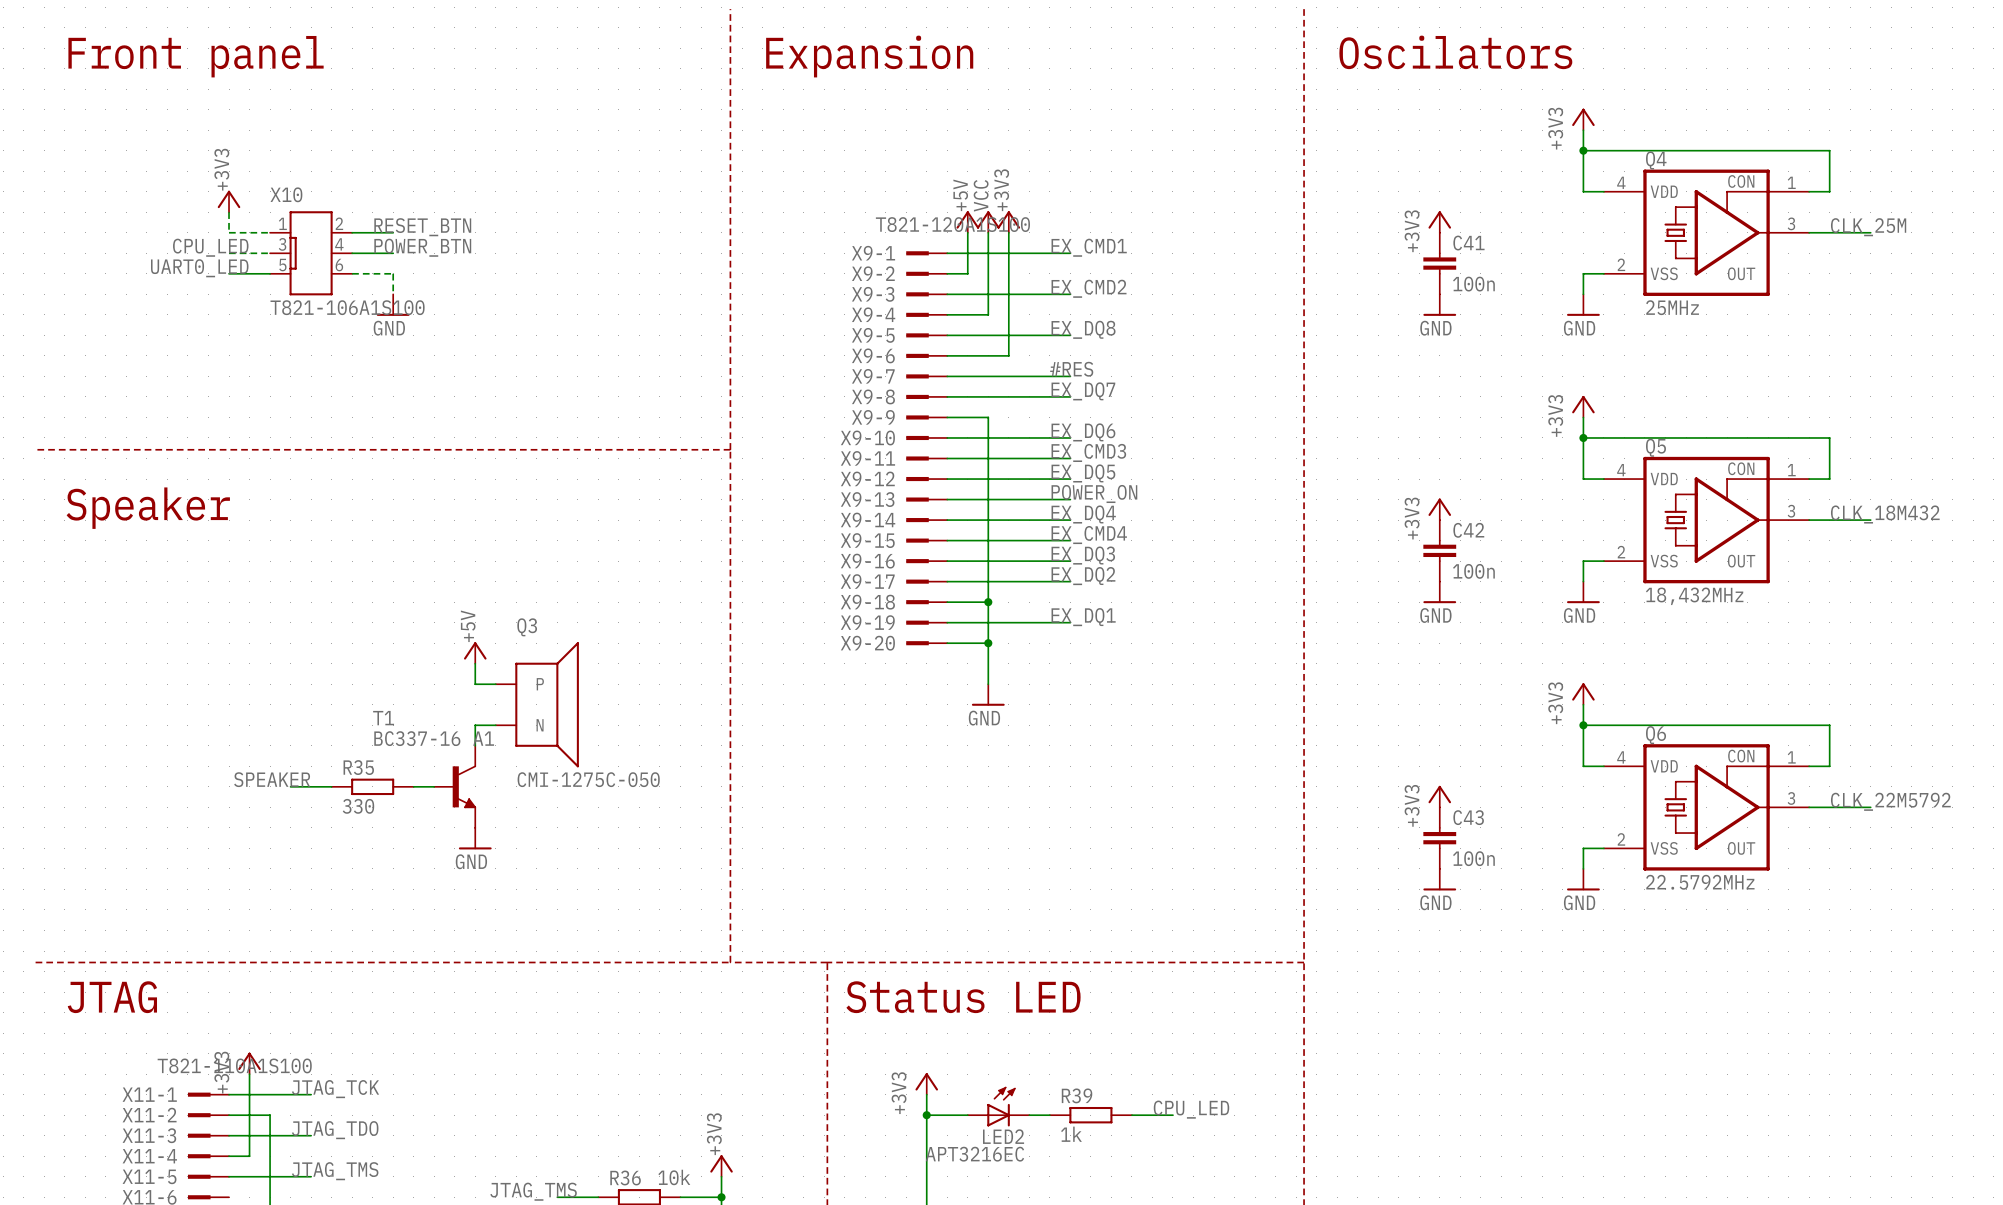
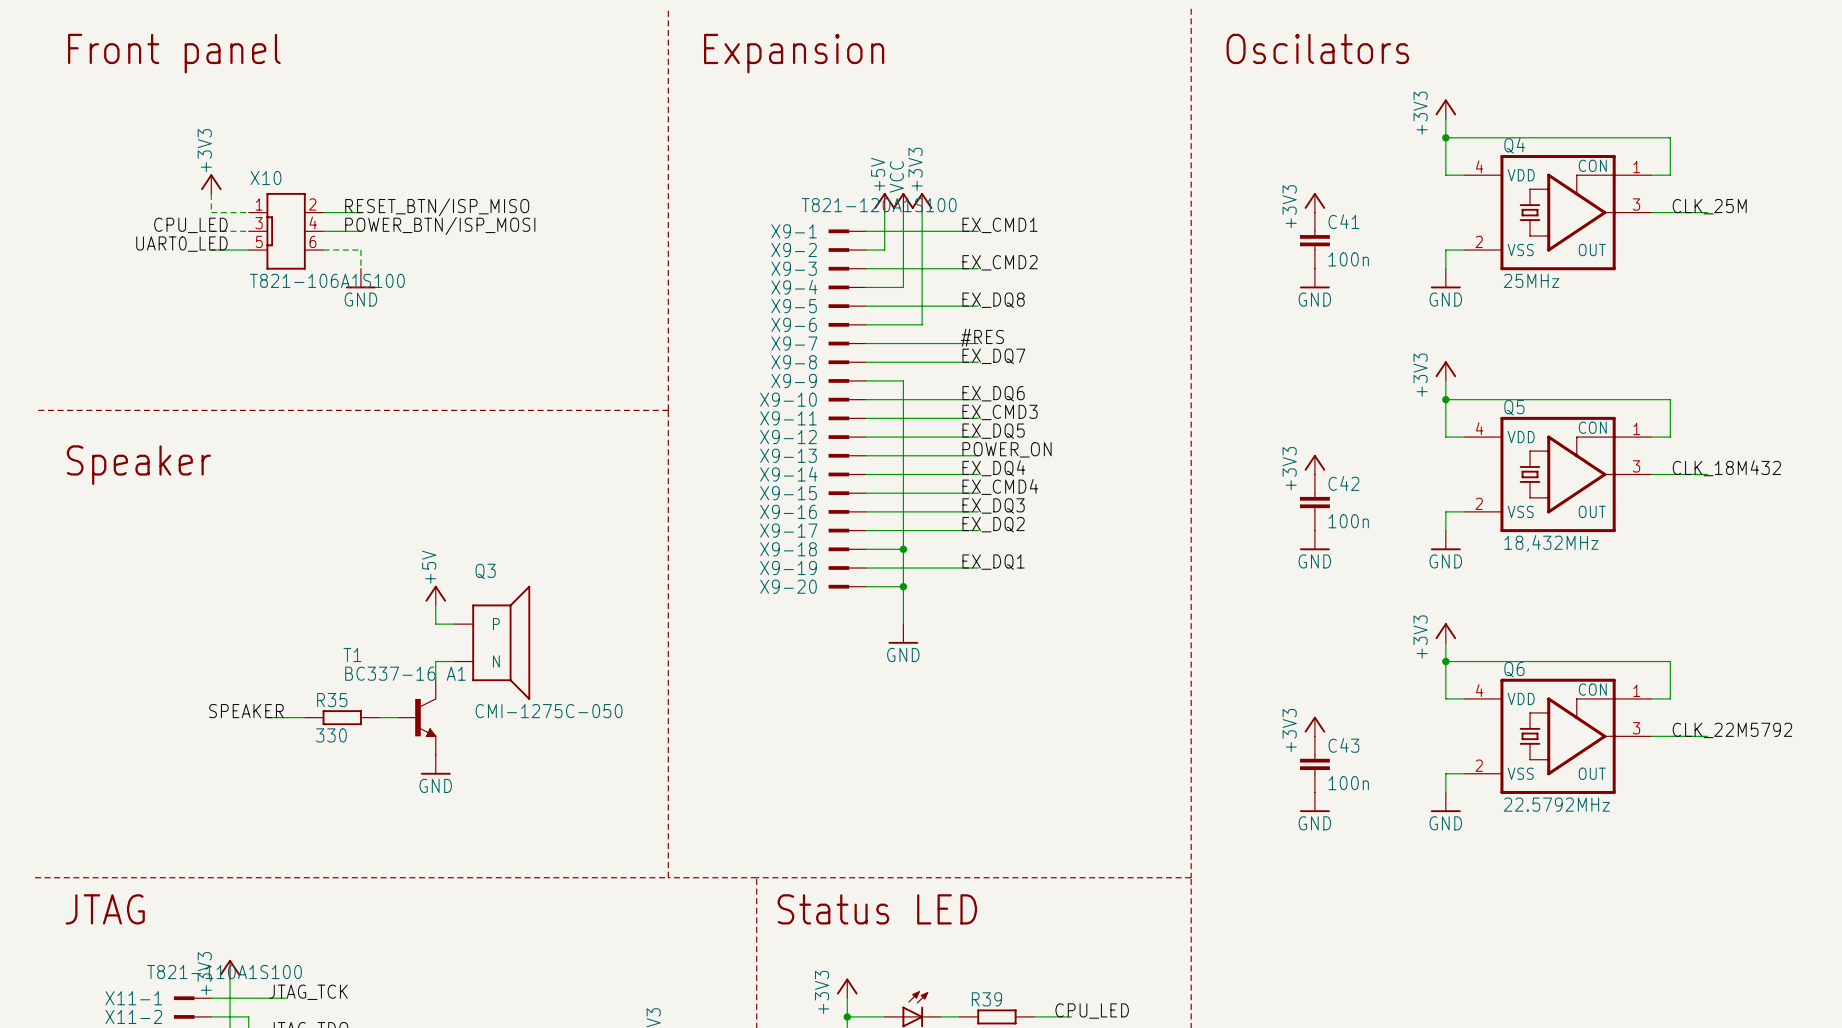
label: RESET_BTN (422, 227) -> RESET_BTN/ISP_MISO (437, 207)
label: POWER_BTN (422, 247) -> POWER_BTN/ISP_MOSI (440, 226)

